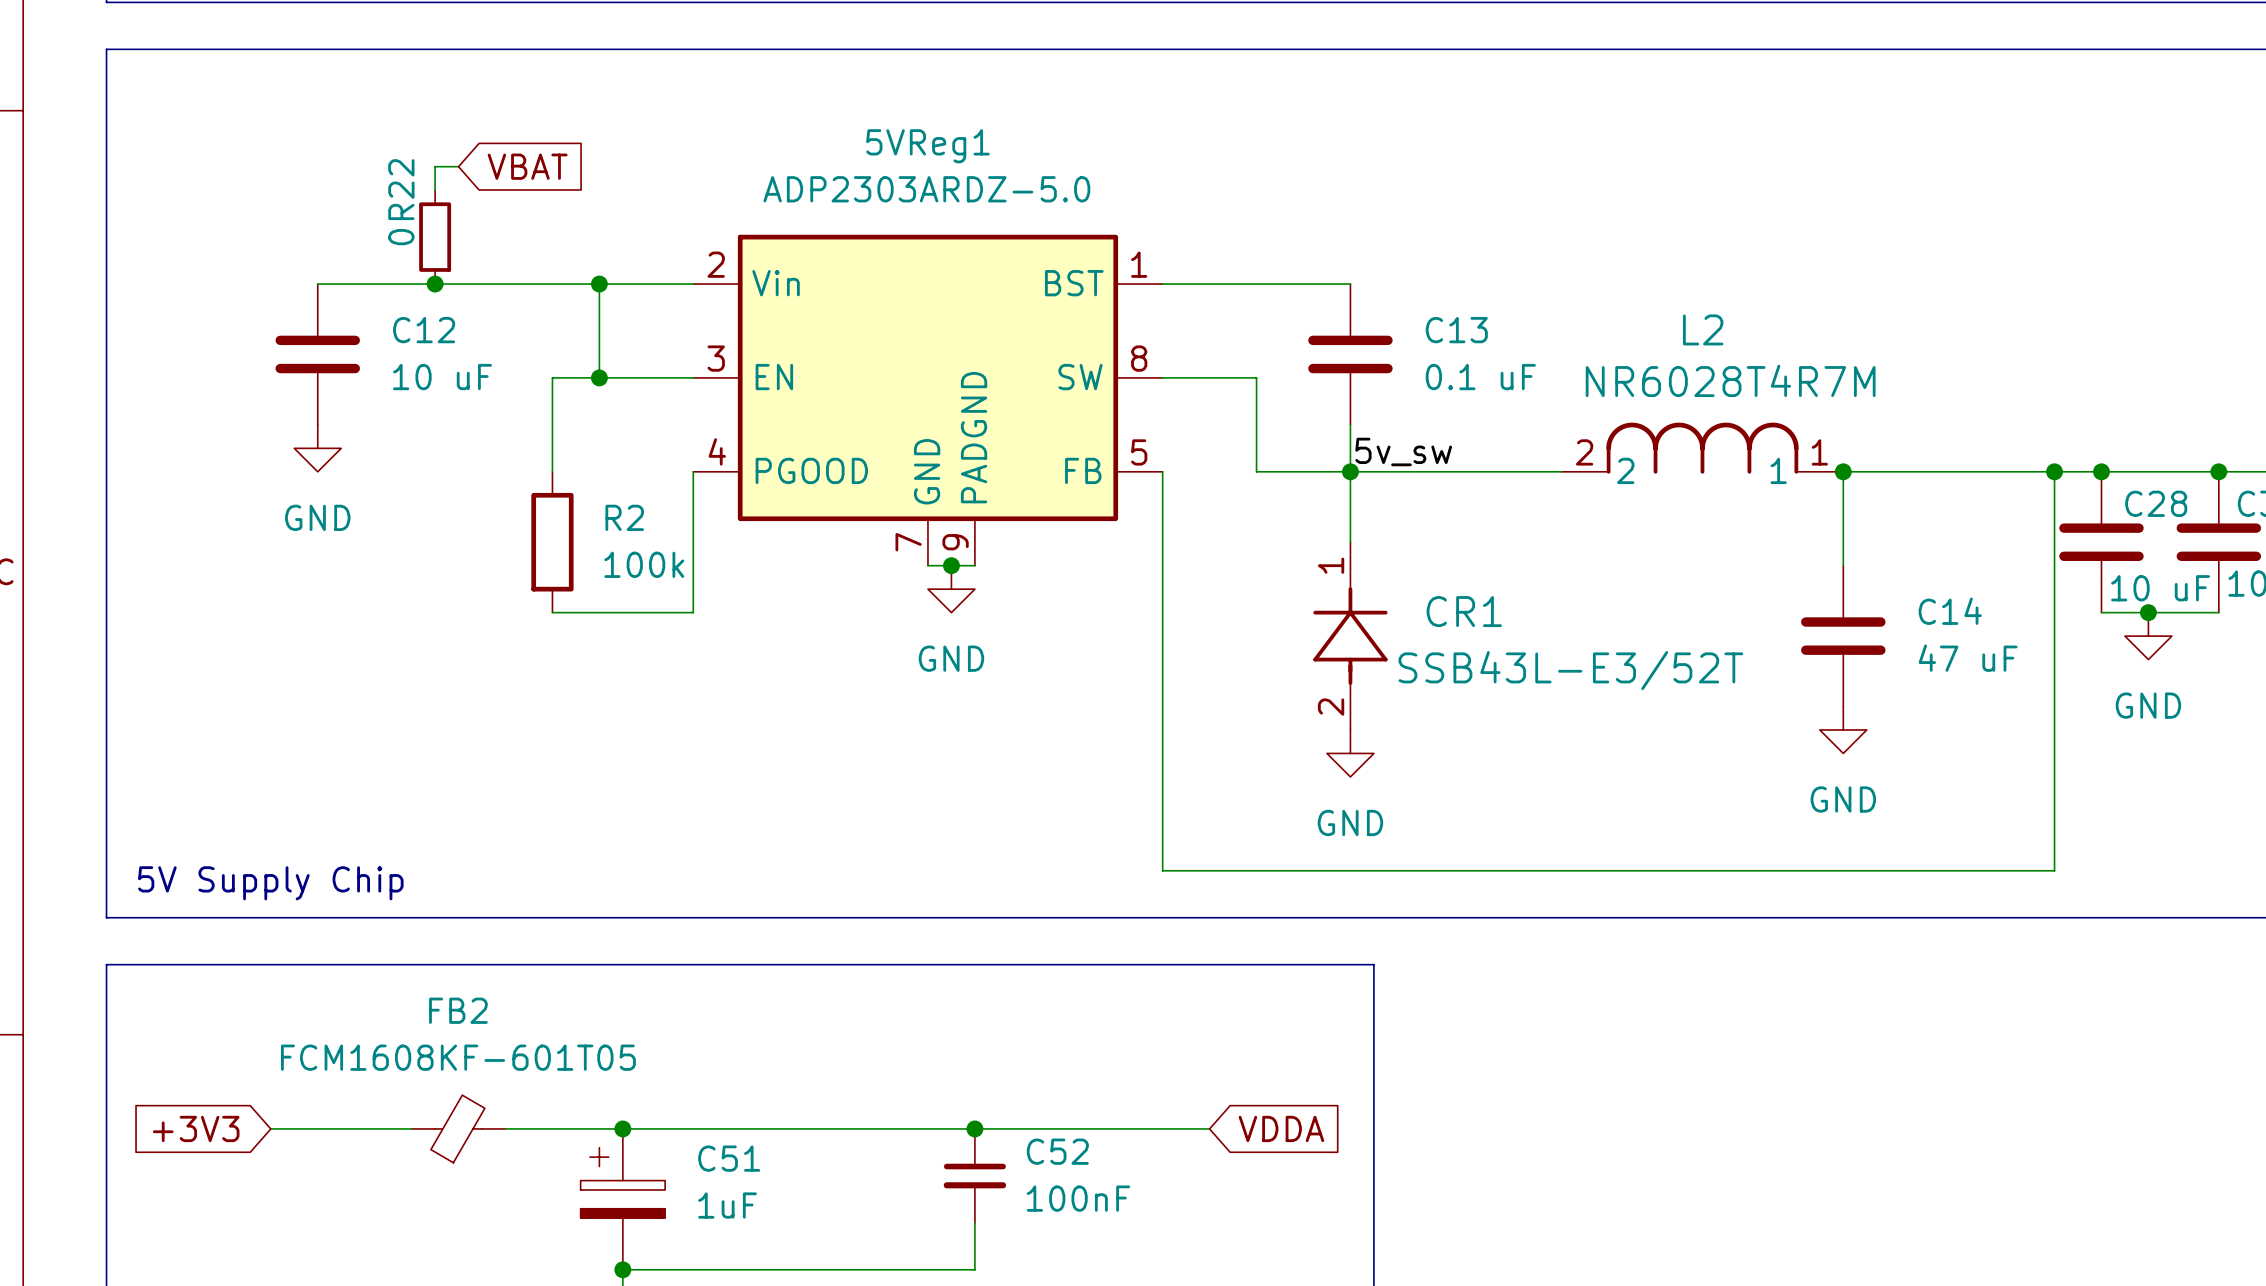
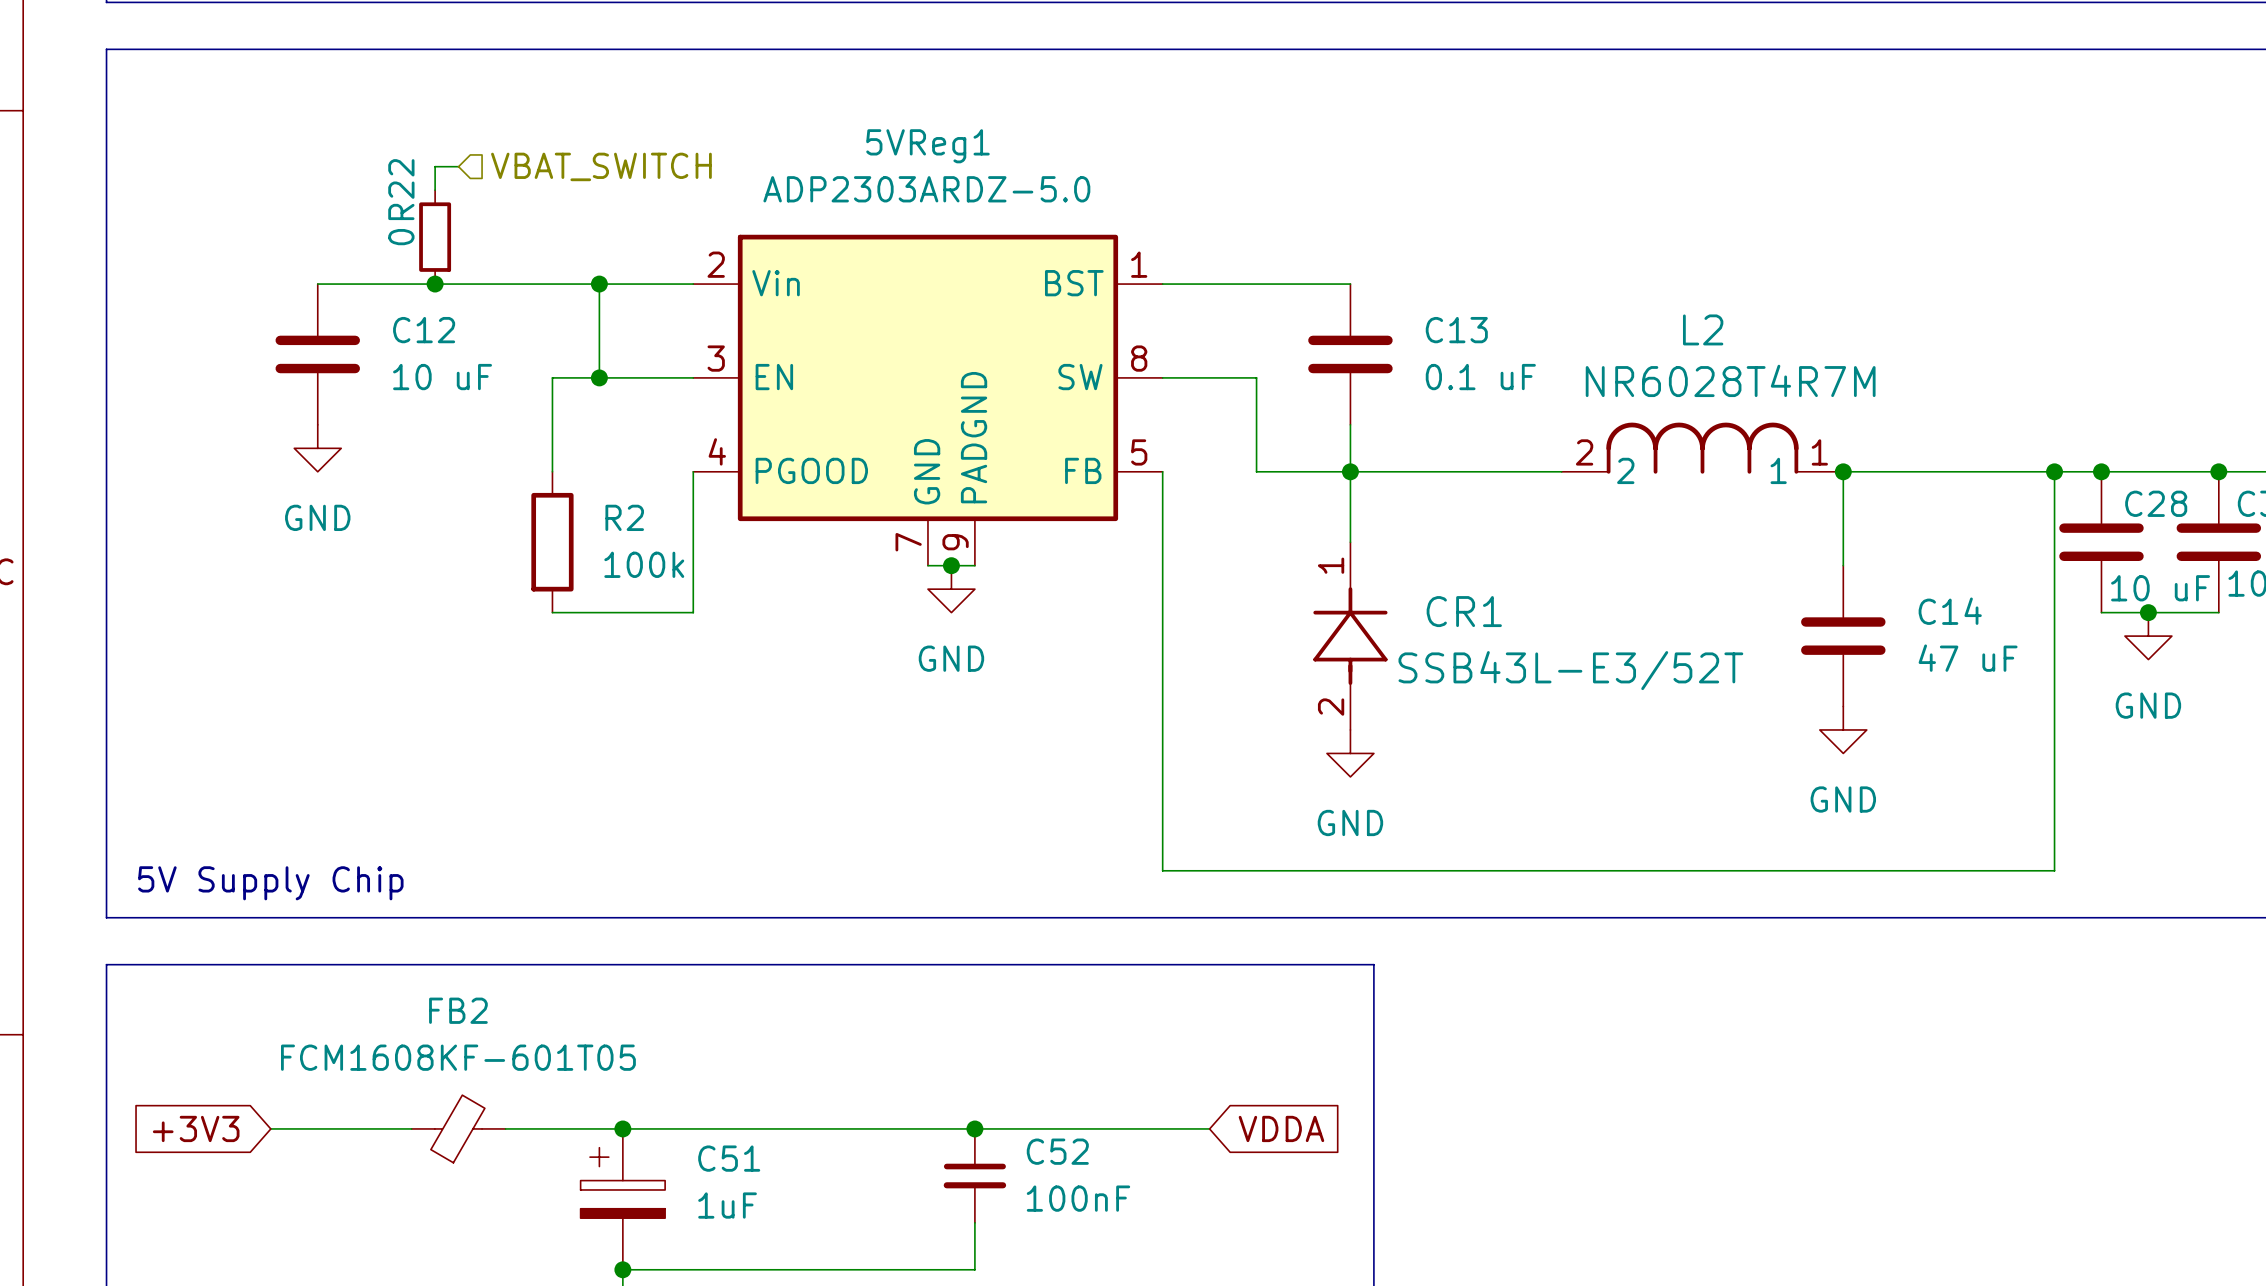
global label: VBAT (527, 166) -> none
hierarchical label: none -> VBAT_SWITCH (601, 166)
label: 5v_sw (1403, 451) -> none

